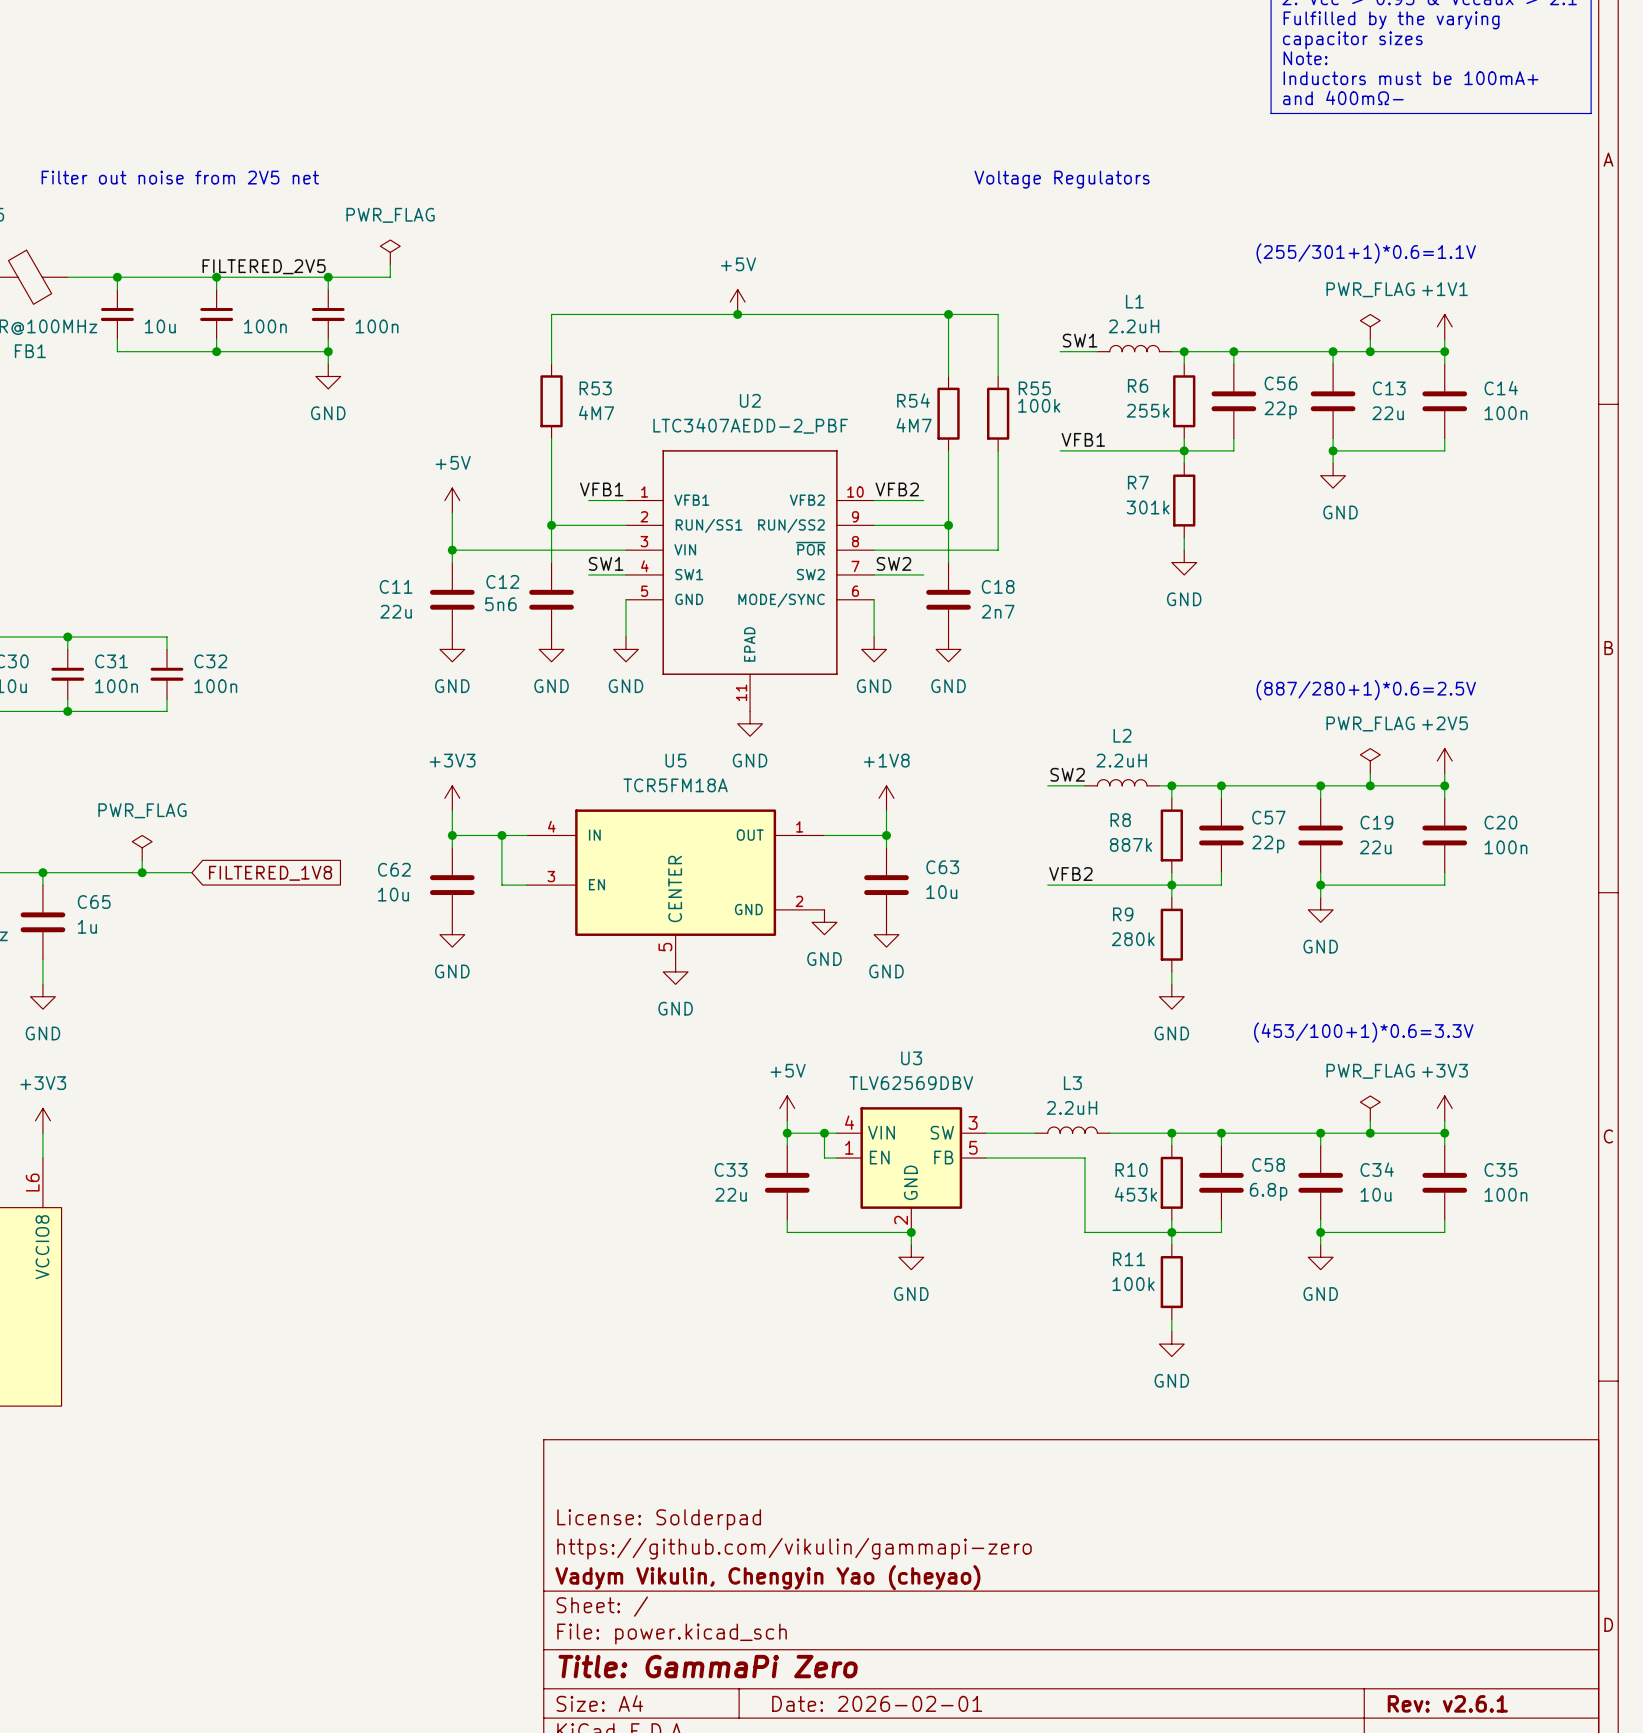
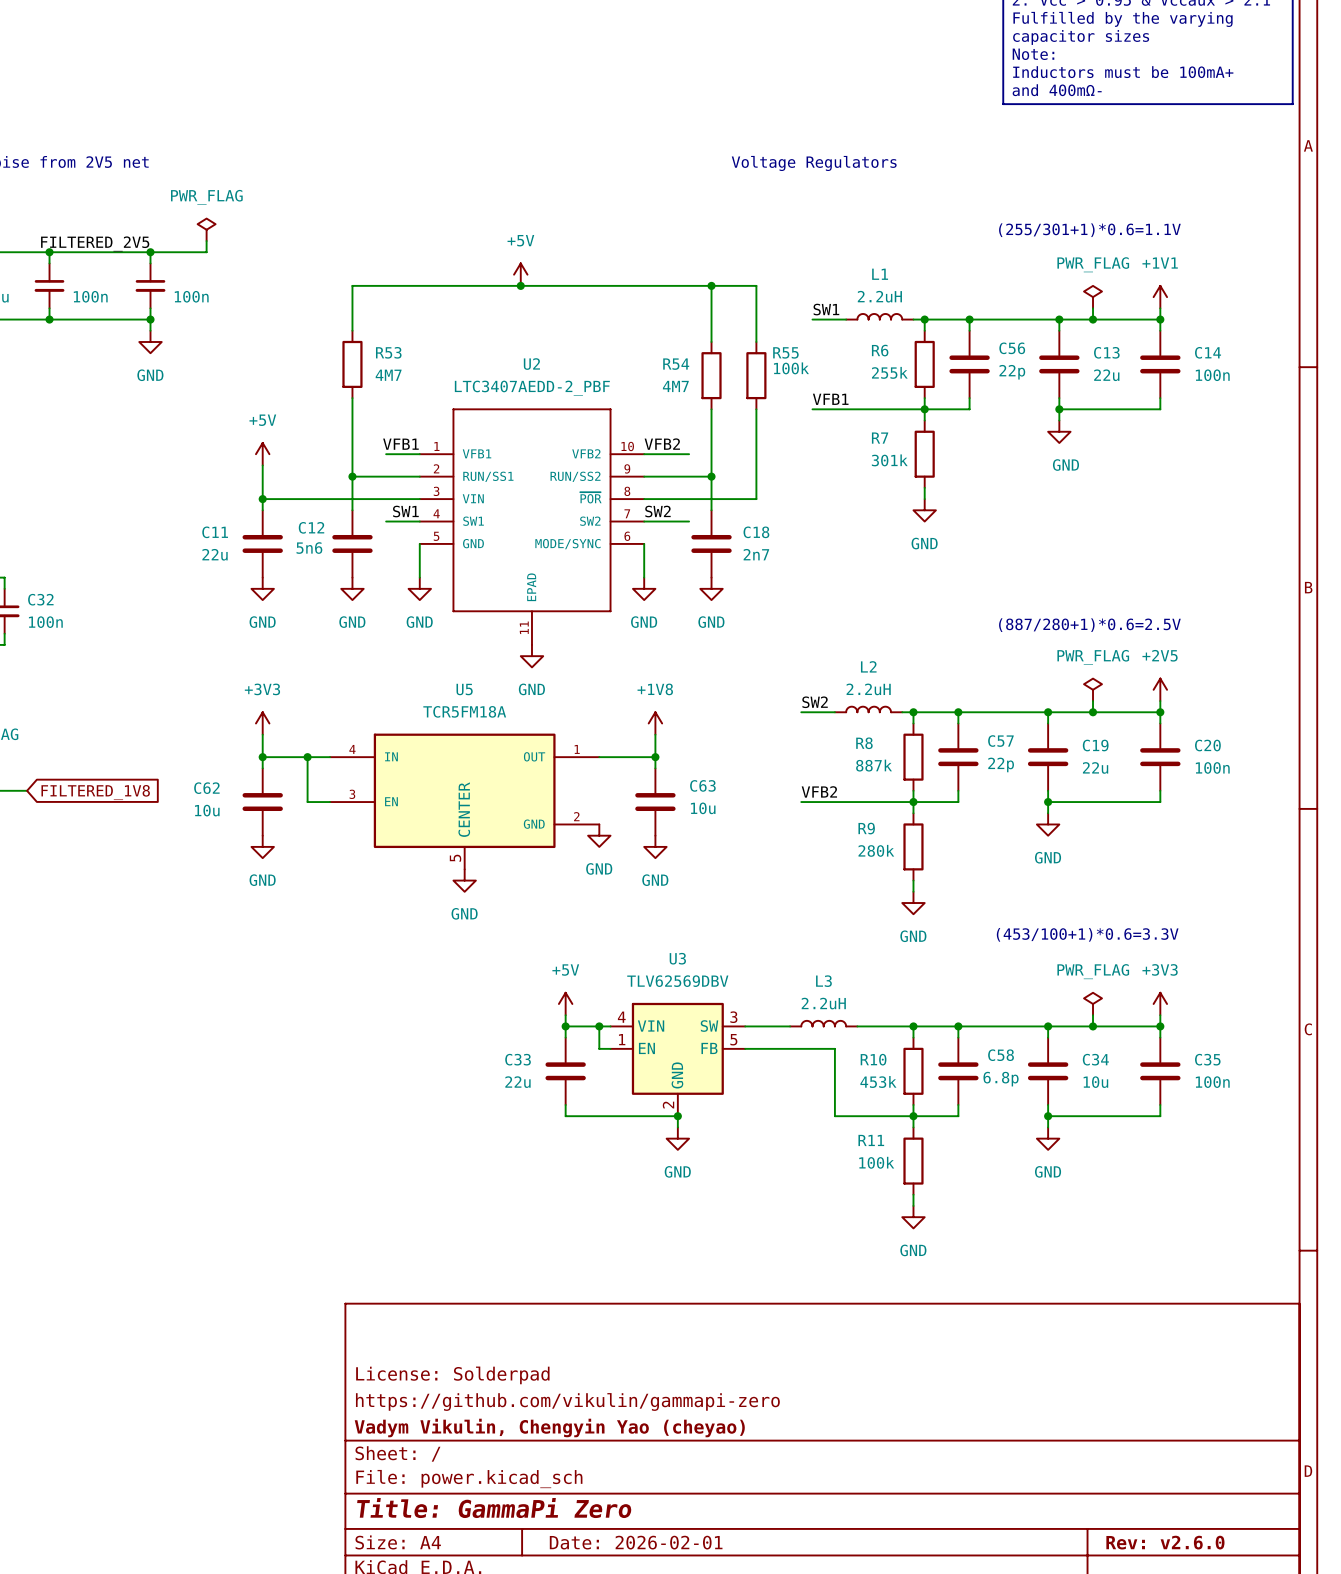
title block: Rev: v2.6.1 (1447, 1703) -> Rev: v2.6.0 (1165, 1542)

